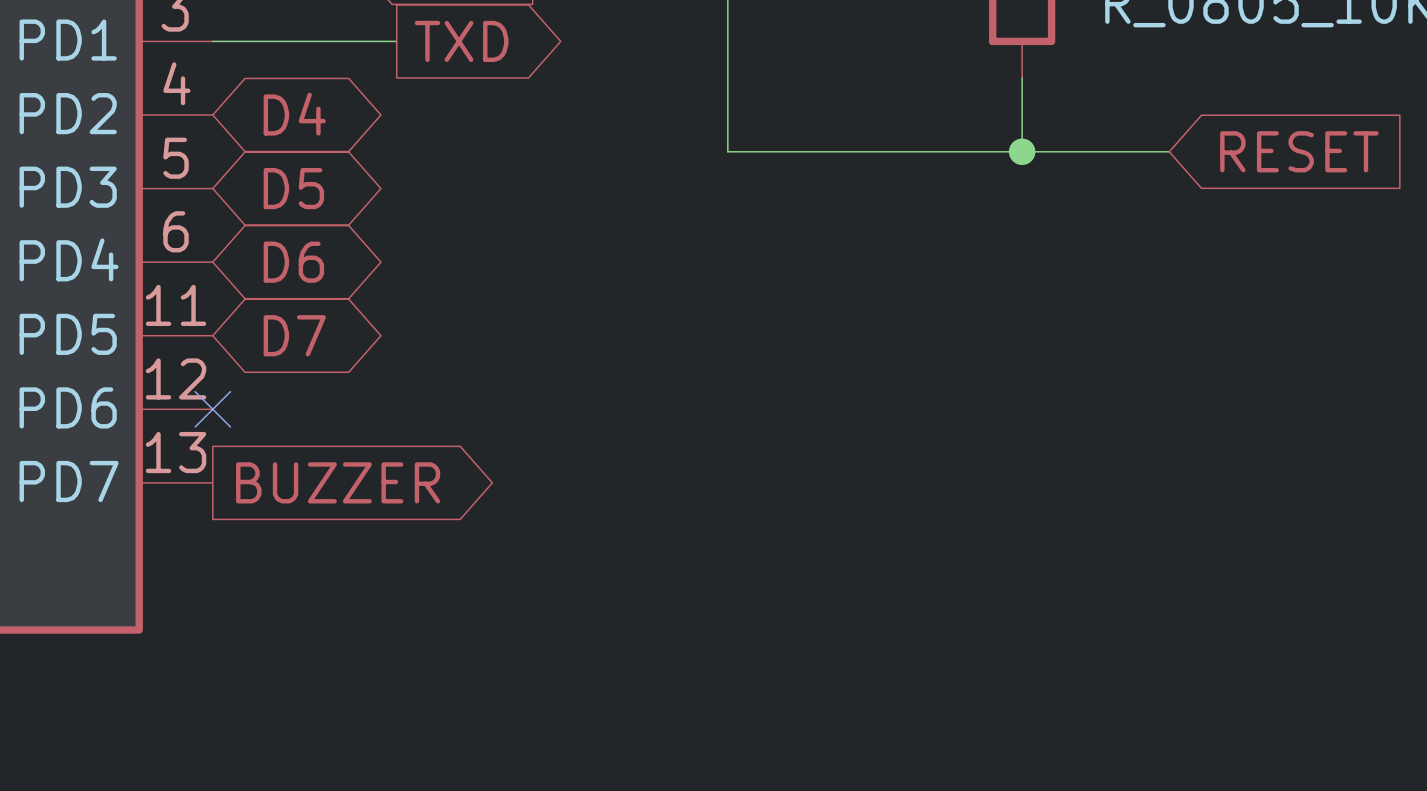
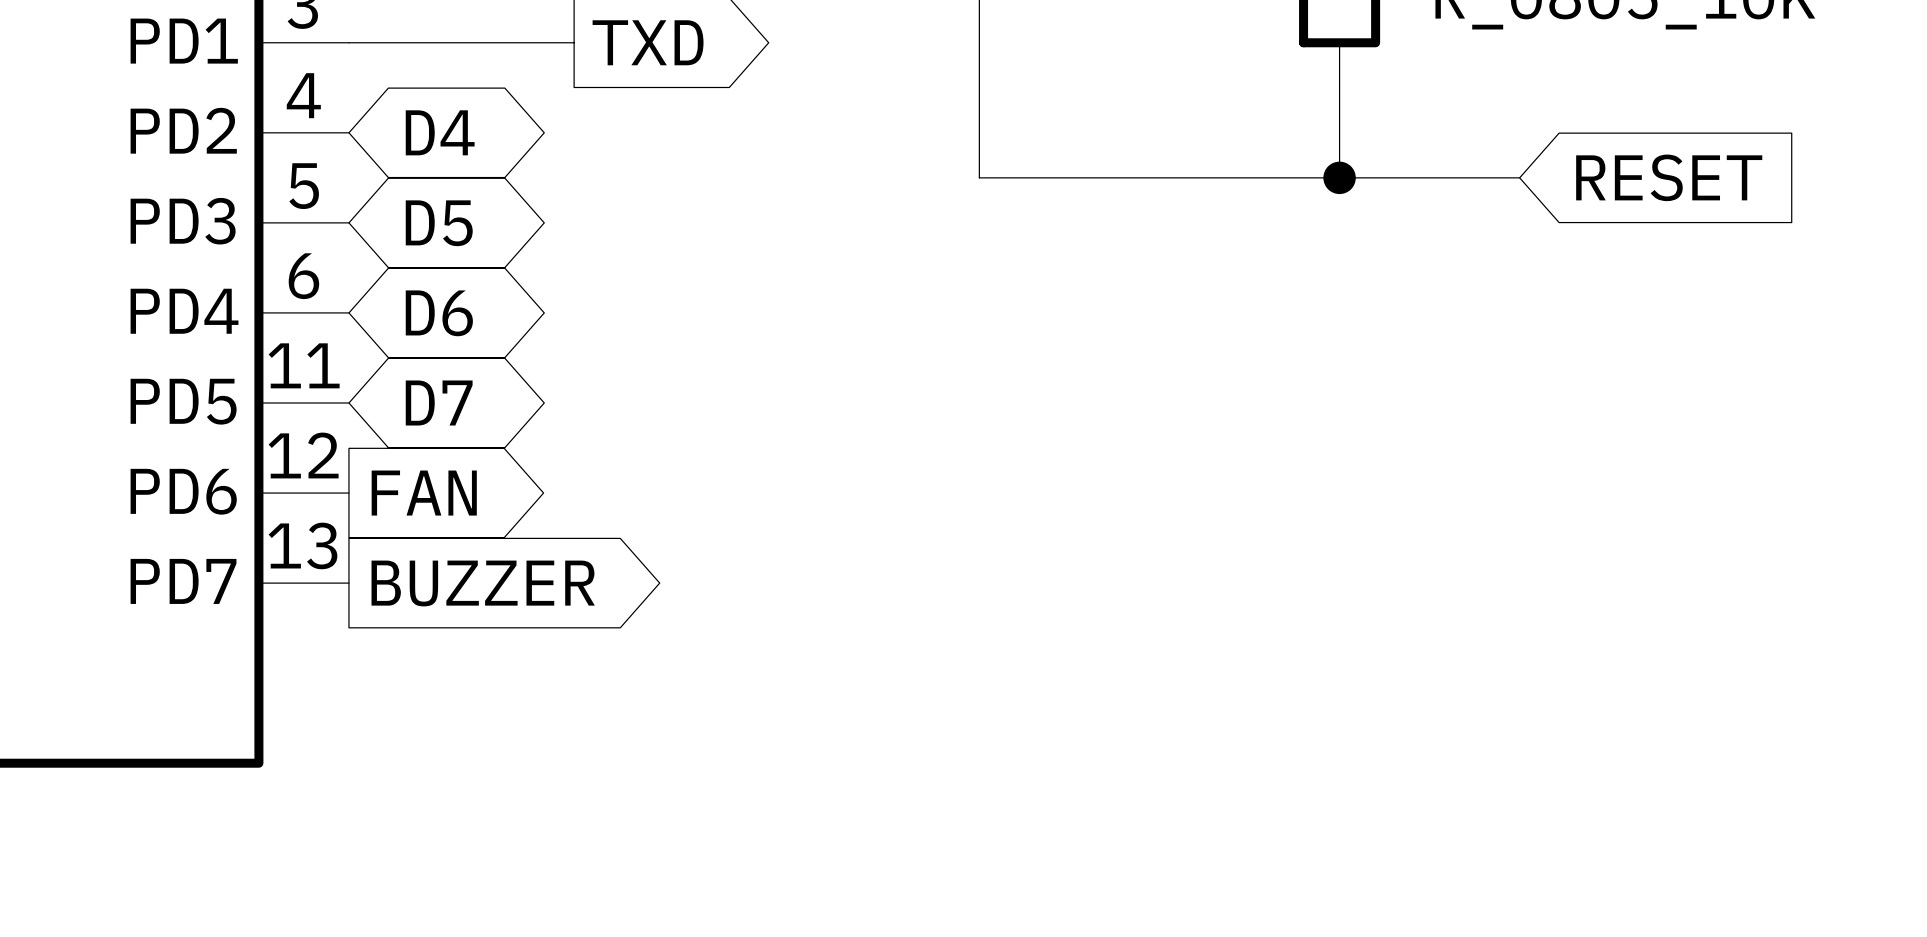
no-connect mark: (212, 409) -> none
global label: none -> FAN (424, 493)

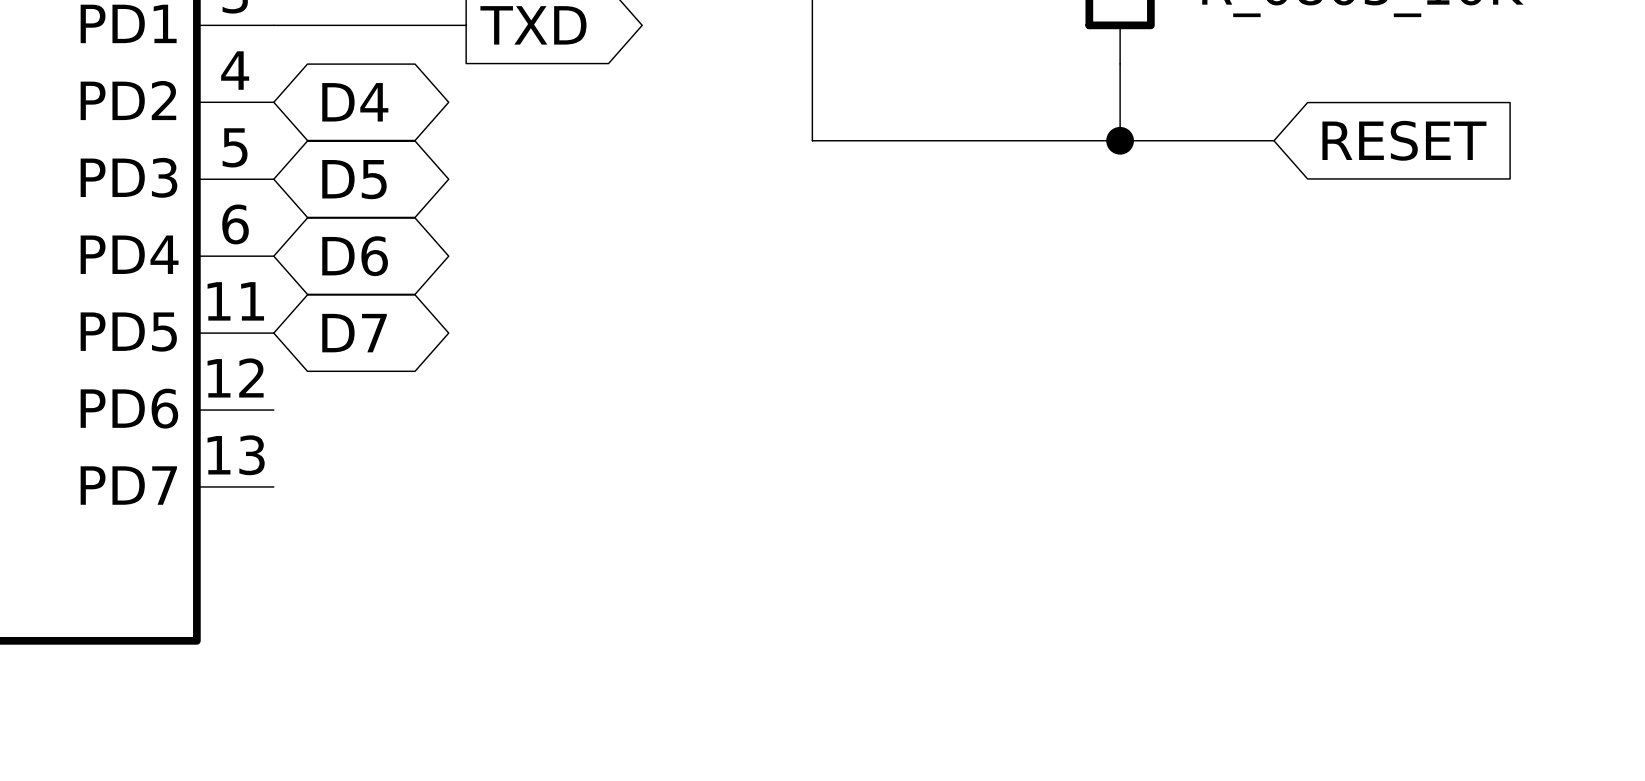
global label: FAN (424, 493) -> none
global label: BUZZER (483, 583) -> none

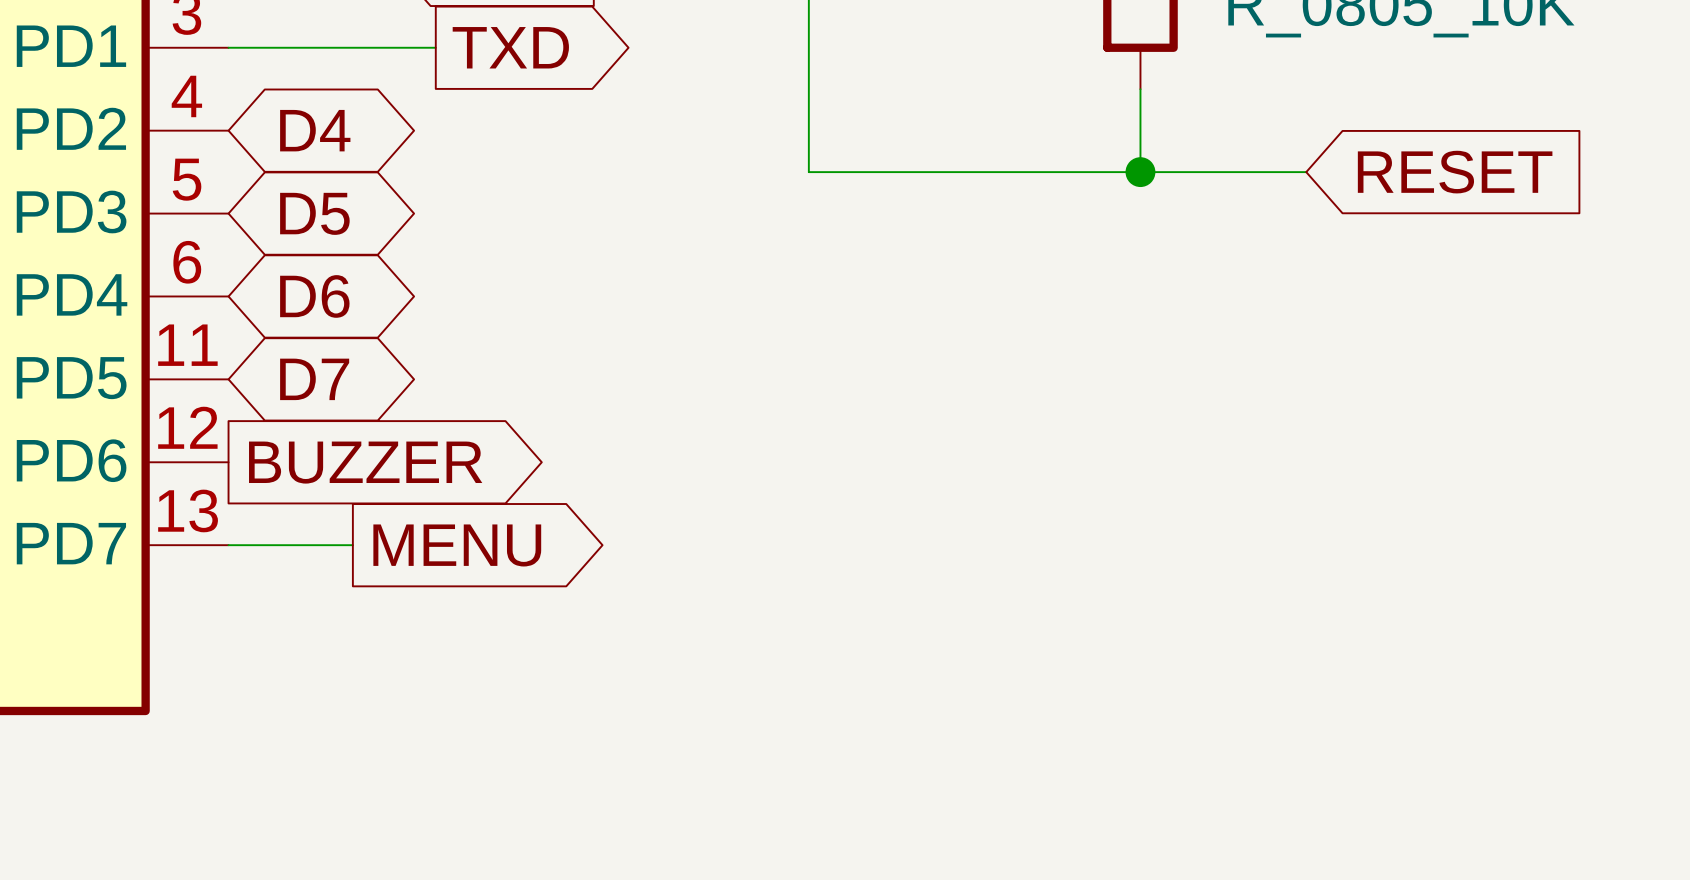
global label: none -> BUZZER (365, 462)
wire: none -> (228, 545) (352, 545)
global label: none -> MENU (457, 545)

